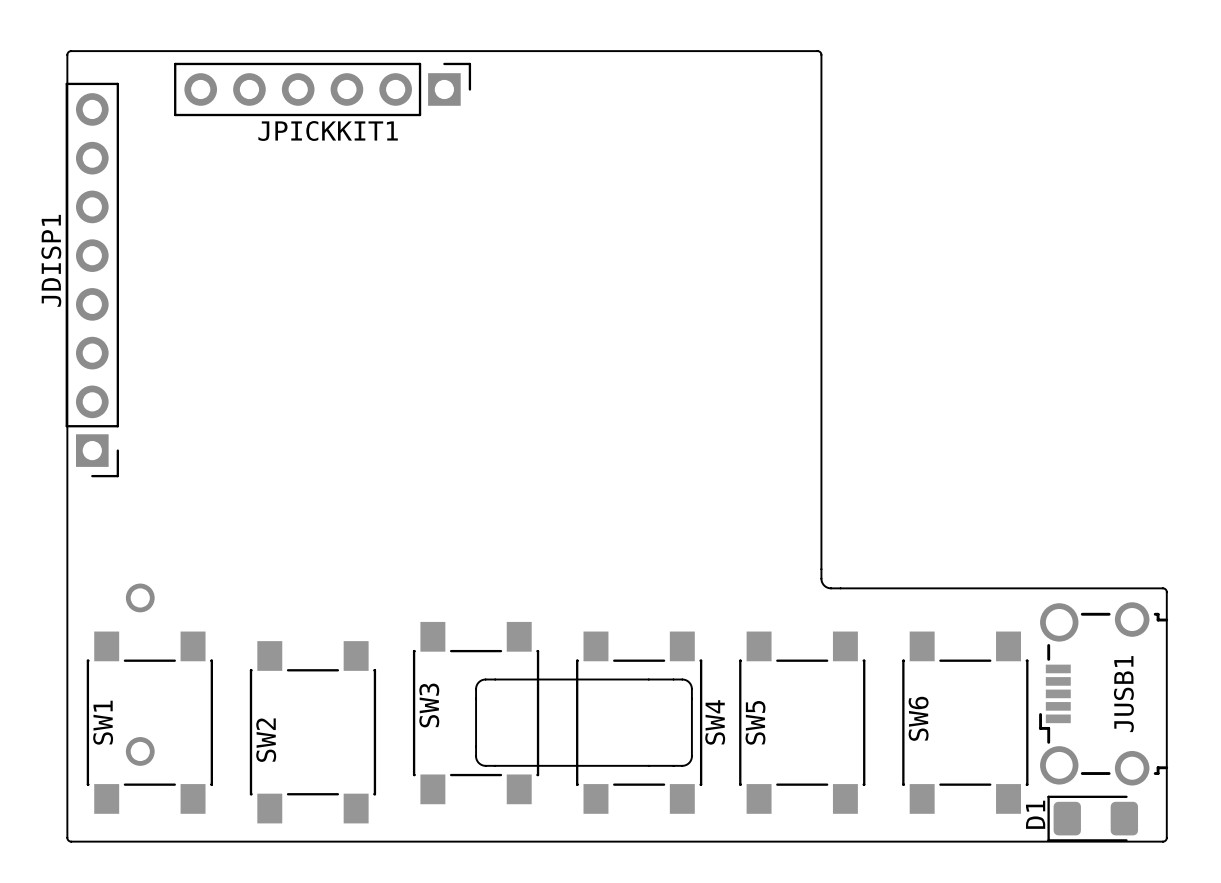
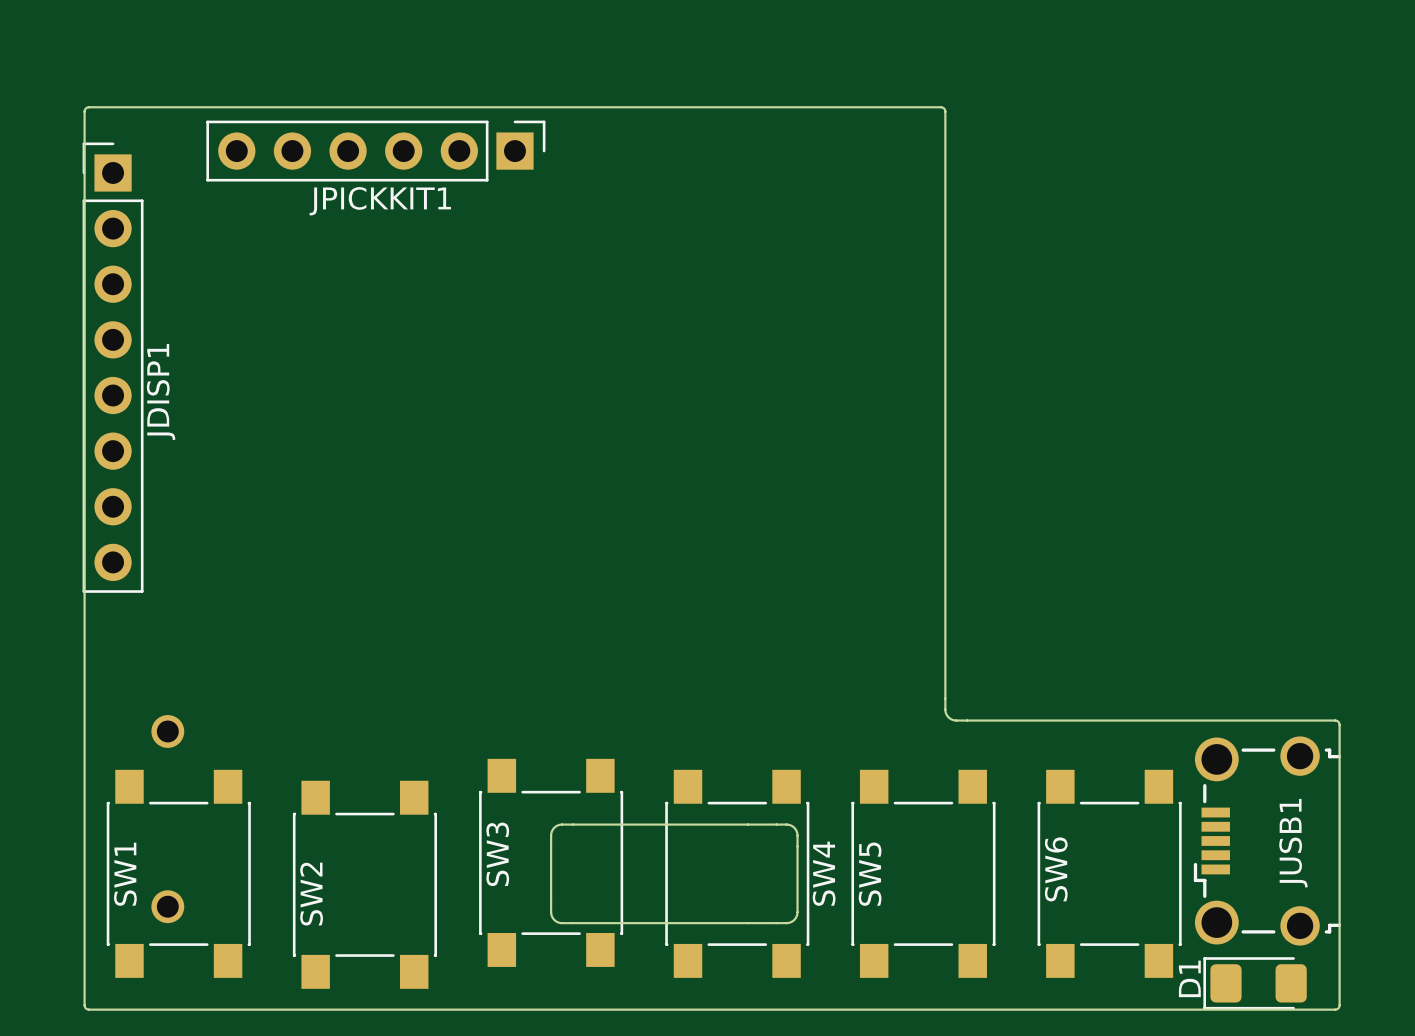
JDISP1 rotation: 0° (92, 280) -> 180° (113, 367)

